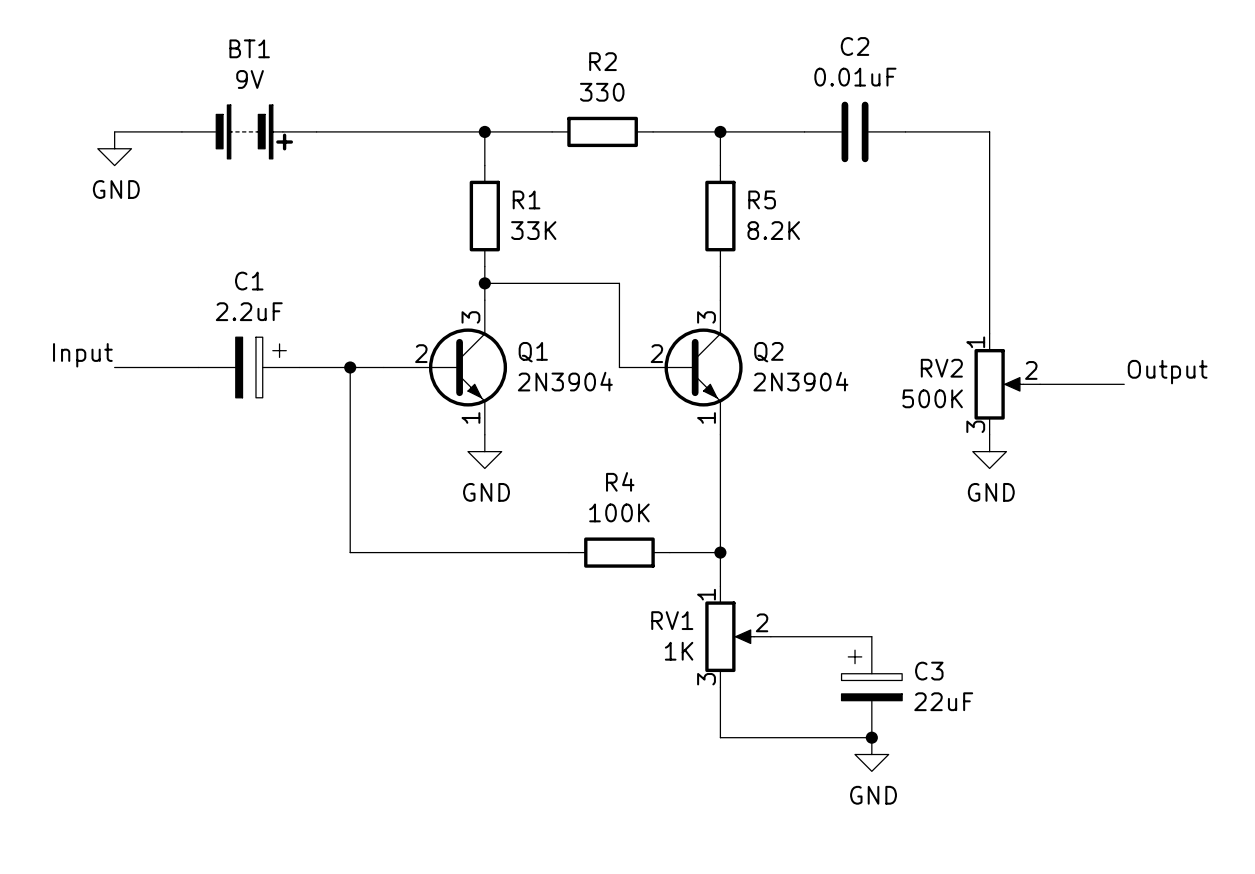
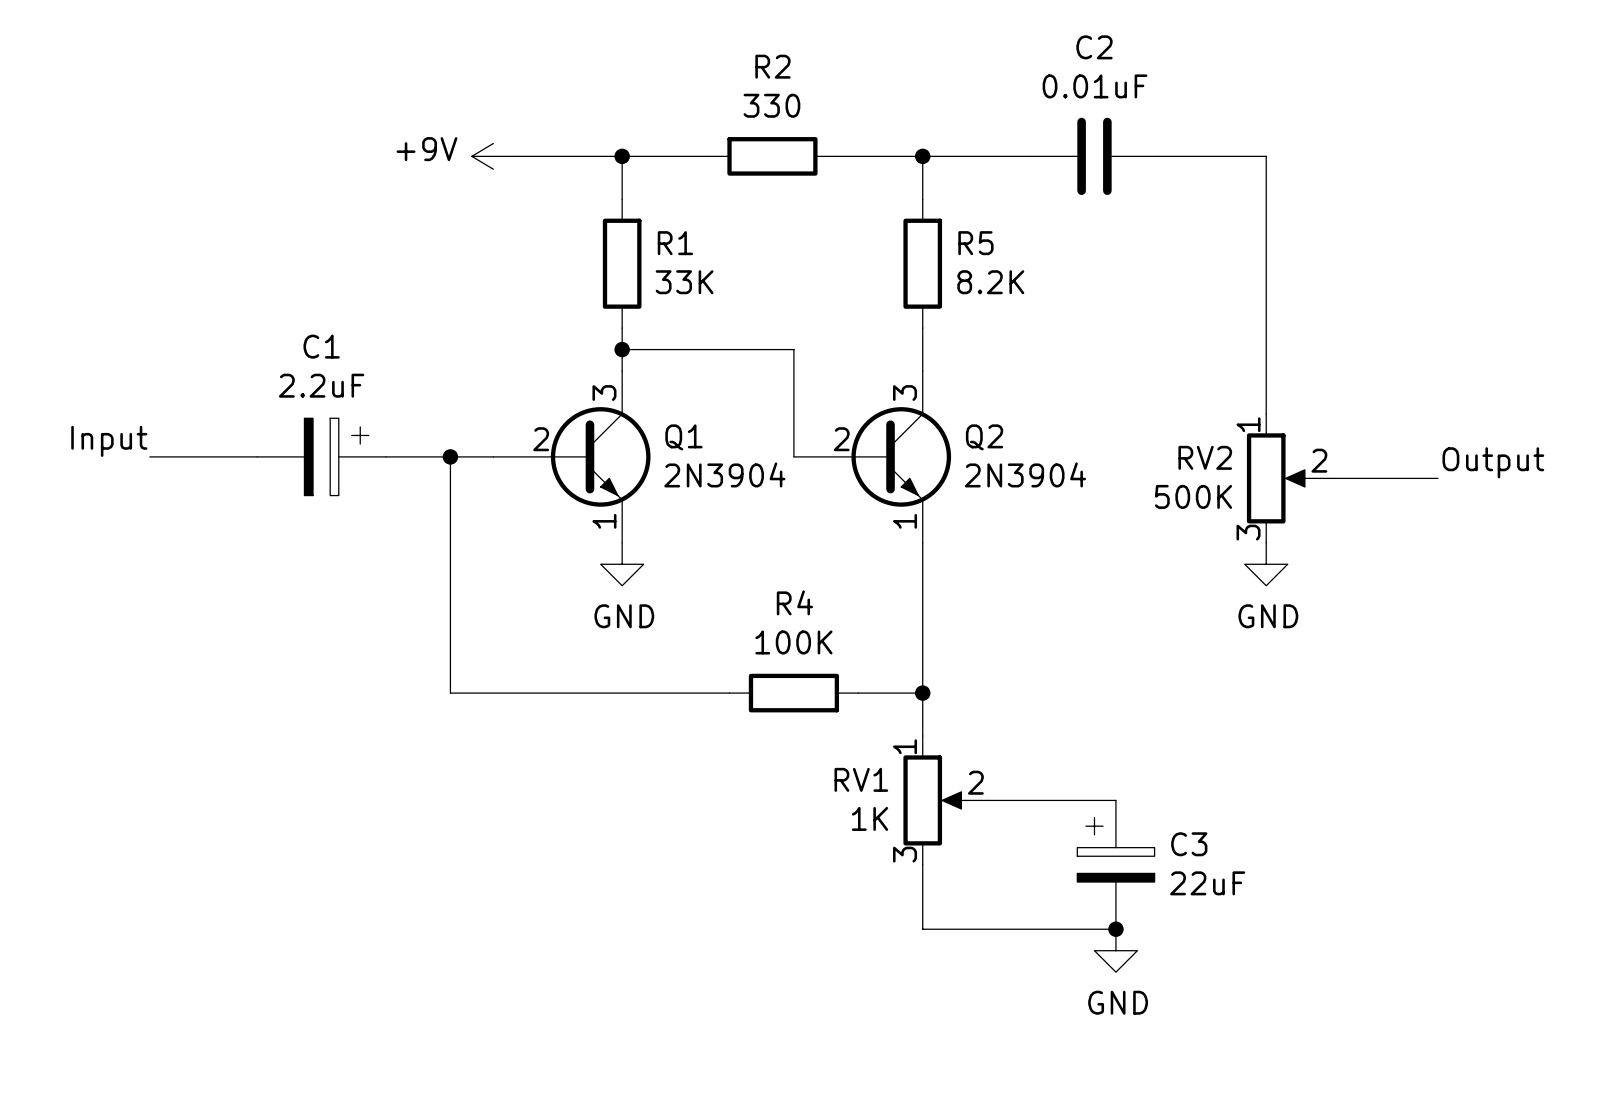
wire: (114, 131) (181, 131) -> none
BT1: 9V (249, 131) -> none
wire: (316, 131) (400, 131) -> none
power symbol: none -> +9V (493, 156)
power symbol: GND (114, 148) -> none

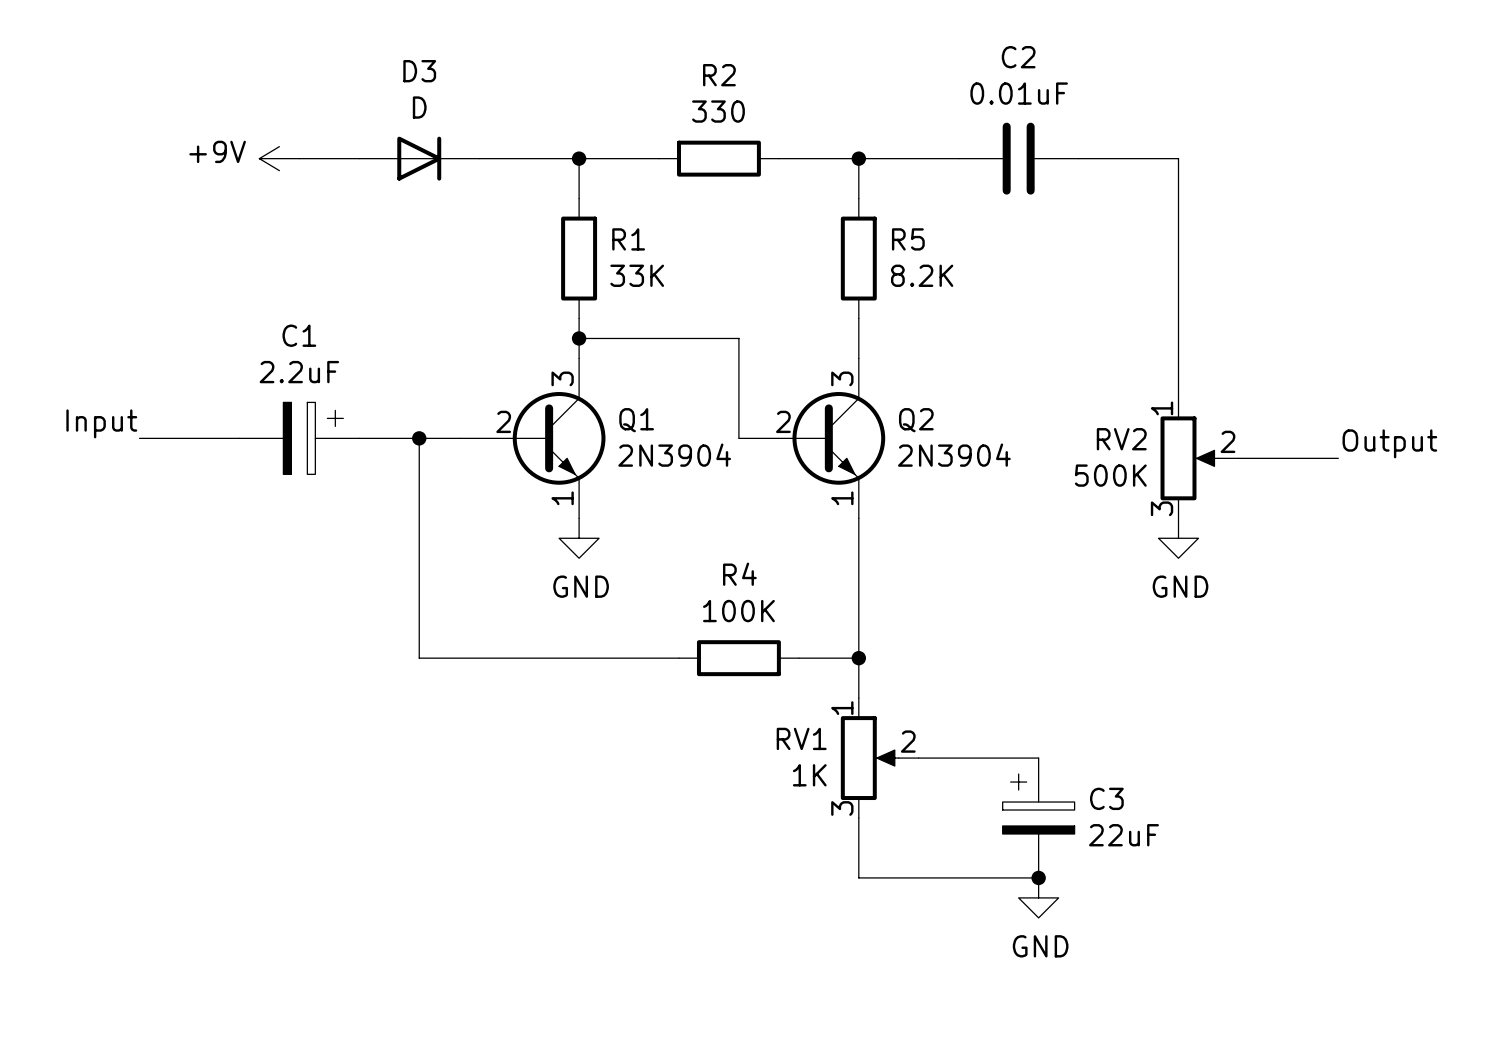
wire: none -> (299, 158) (359, 158)
D3: none -> D (419, 158)
power symbol position: +9V (493, 156) -> +9V (279, 158)

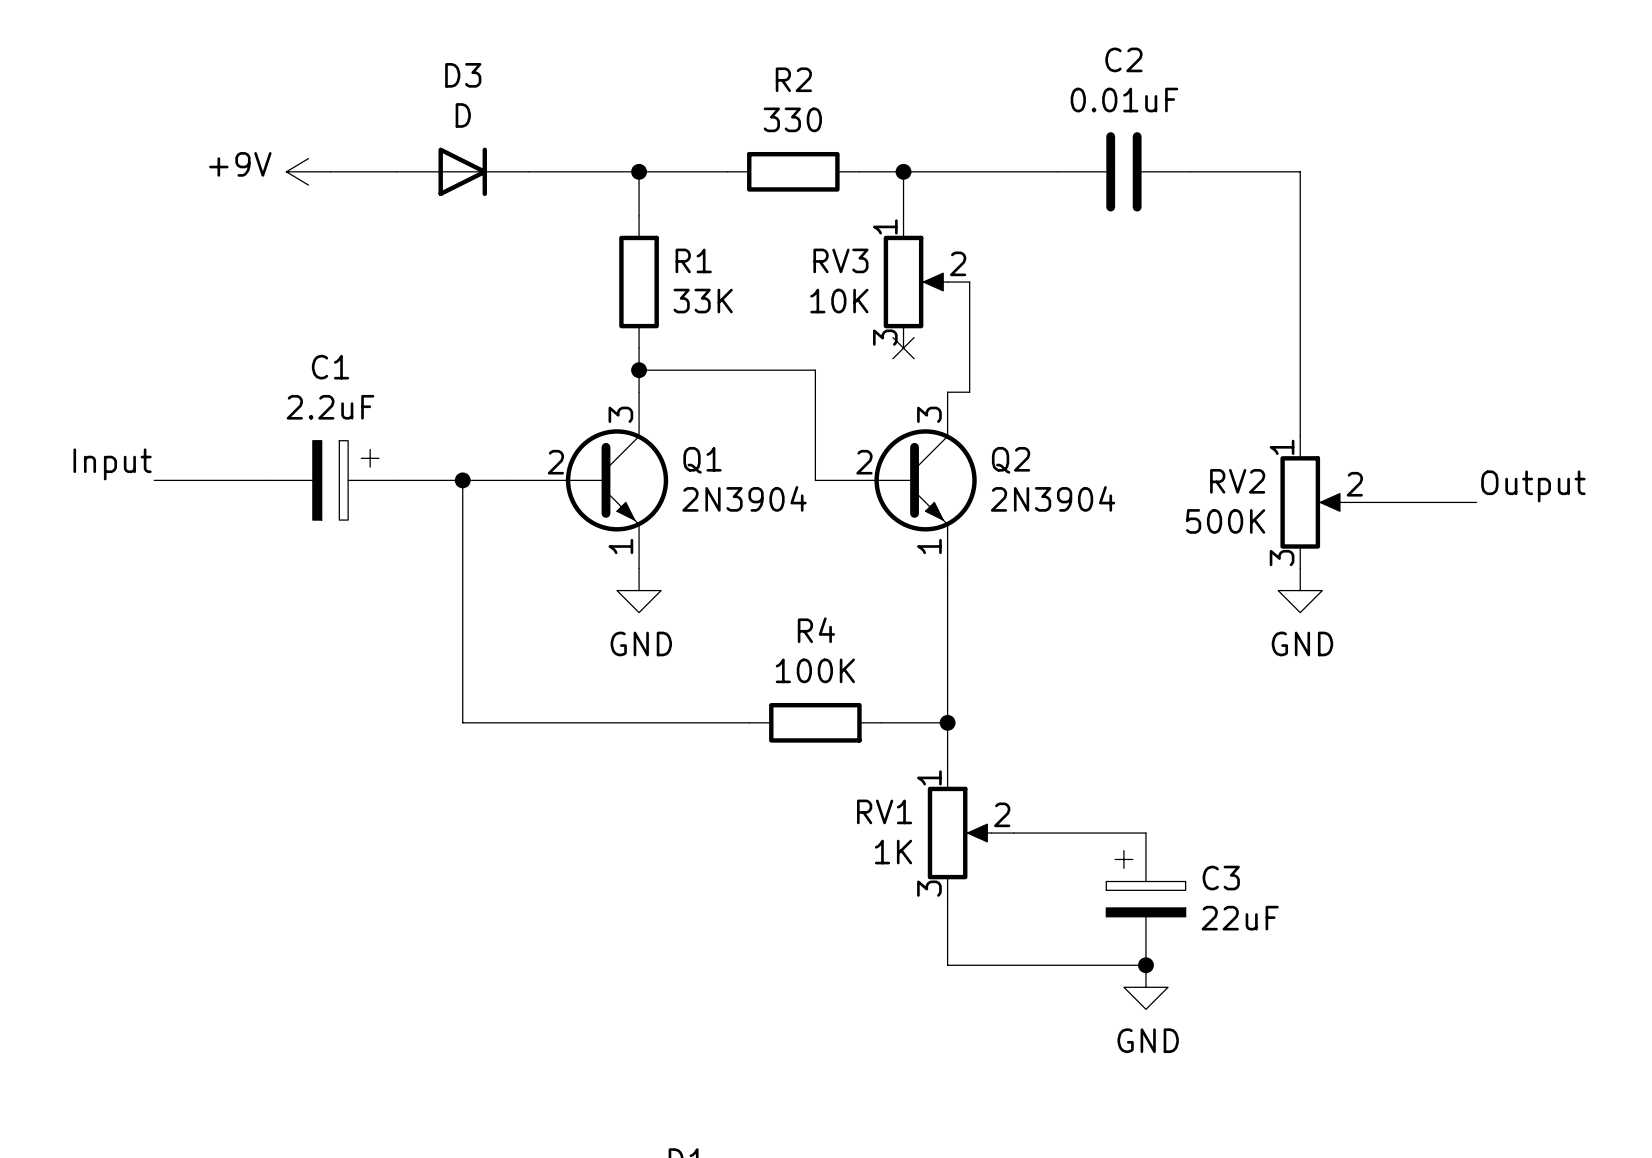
wire: (858, 158) (858, 198) -> (903, 171) (903, 215)
junction position: (858, 158) -> (903, 171)
RV3: none -> 10K (926, 282)
R5: 8.2K (858, 258) -> none
no-connect mark: none -> (903, 348)
wire: (858, 318) (858, 358) -> (969, 282) (969, 392) (947, 392)

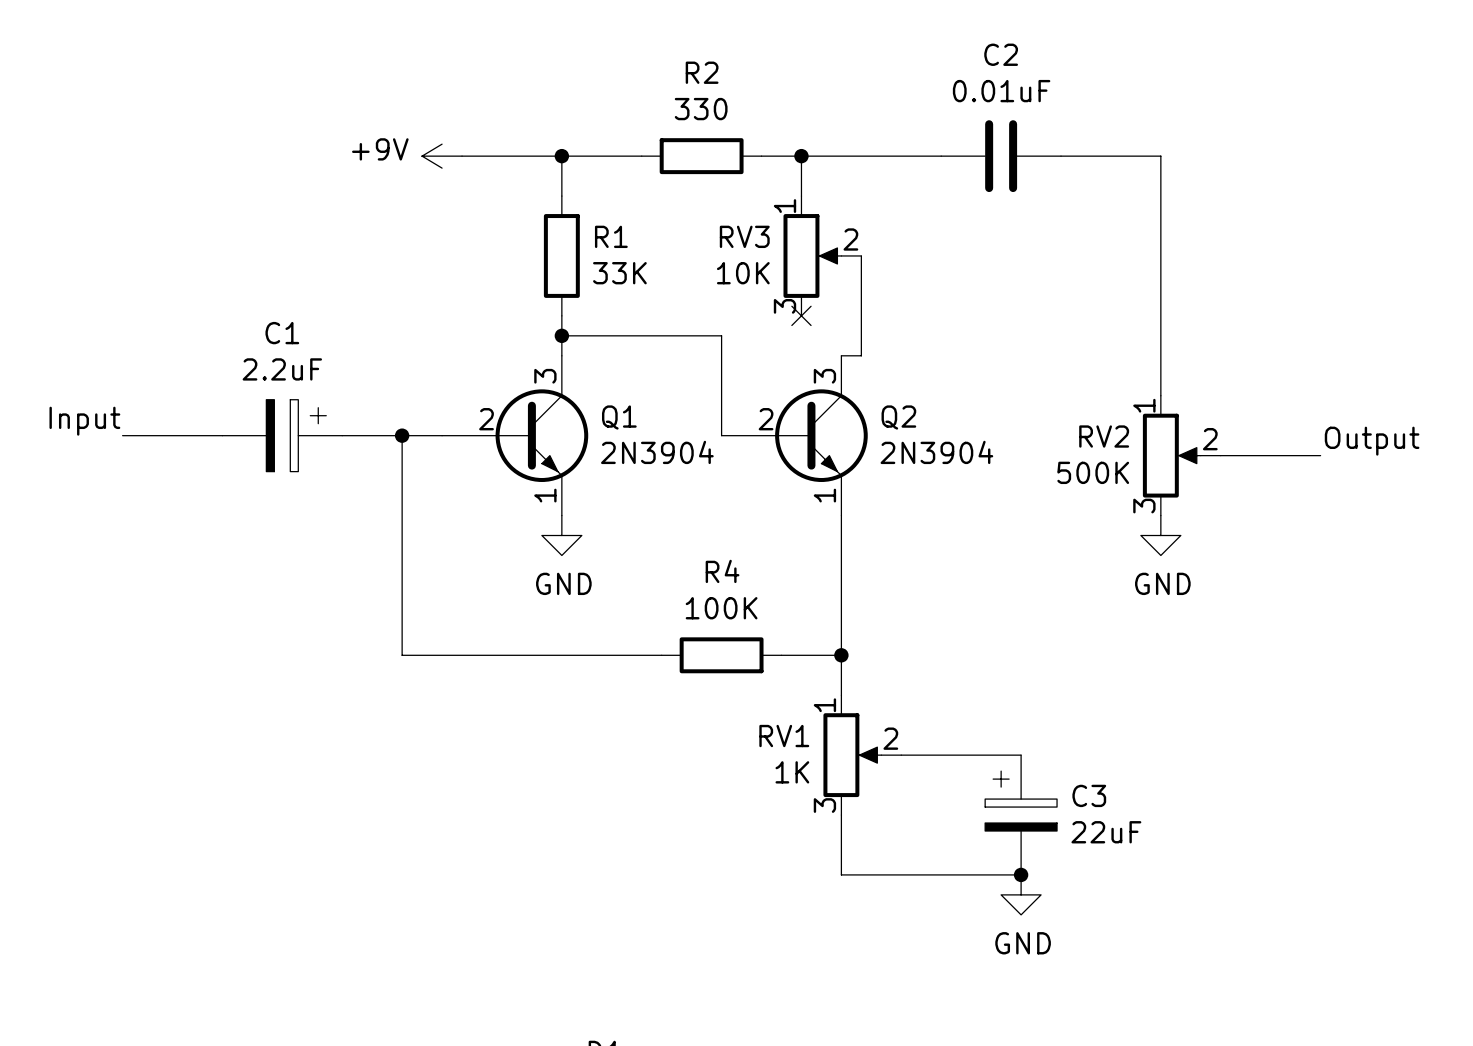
power symbol position: +9V (308, 171) -> +9V (442, 156)
wire: (330, 171) (396, 171) -> none
D3: D (462, 171) -> none

